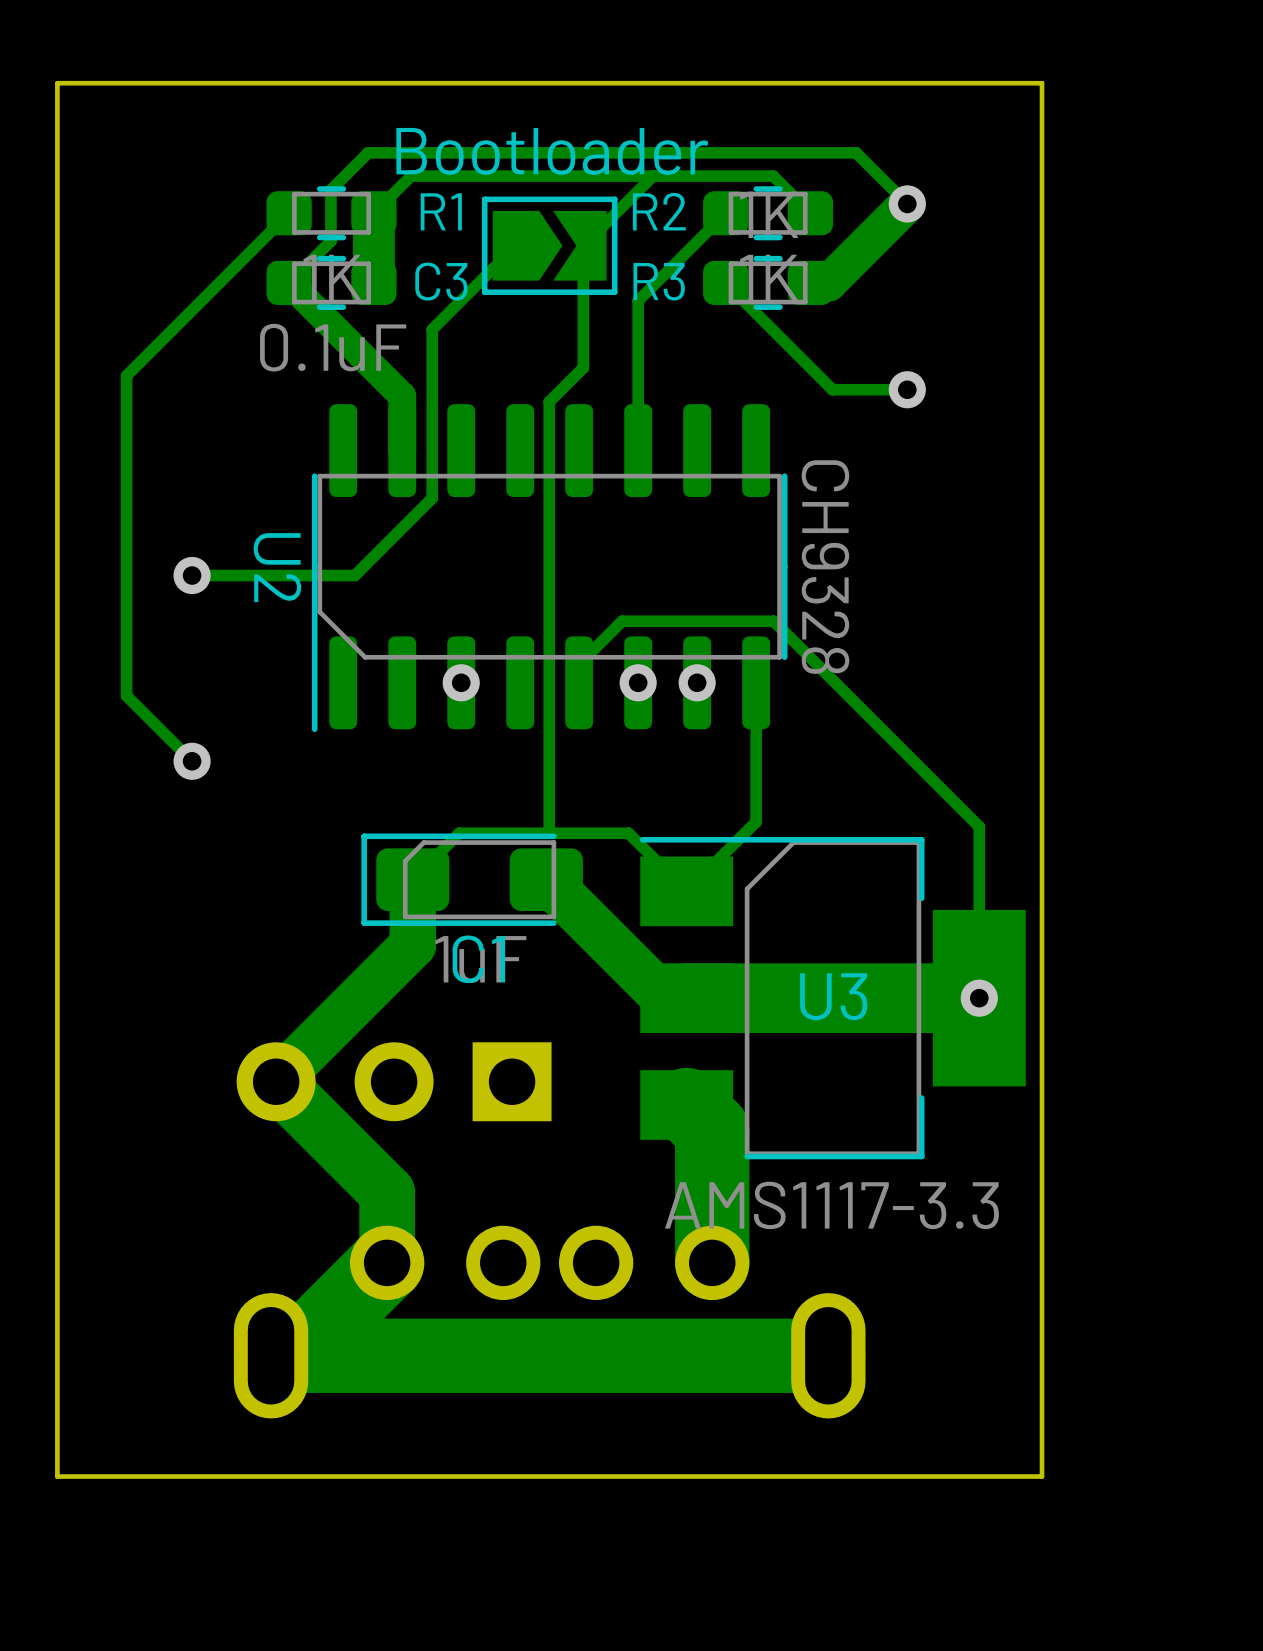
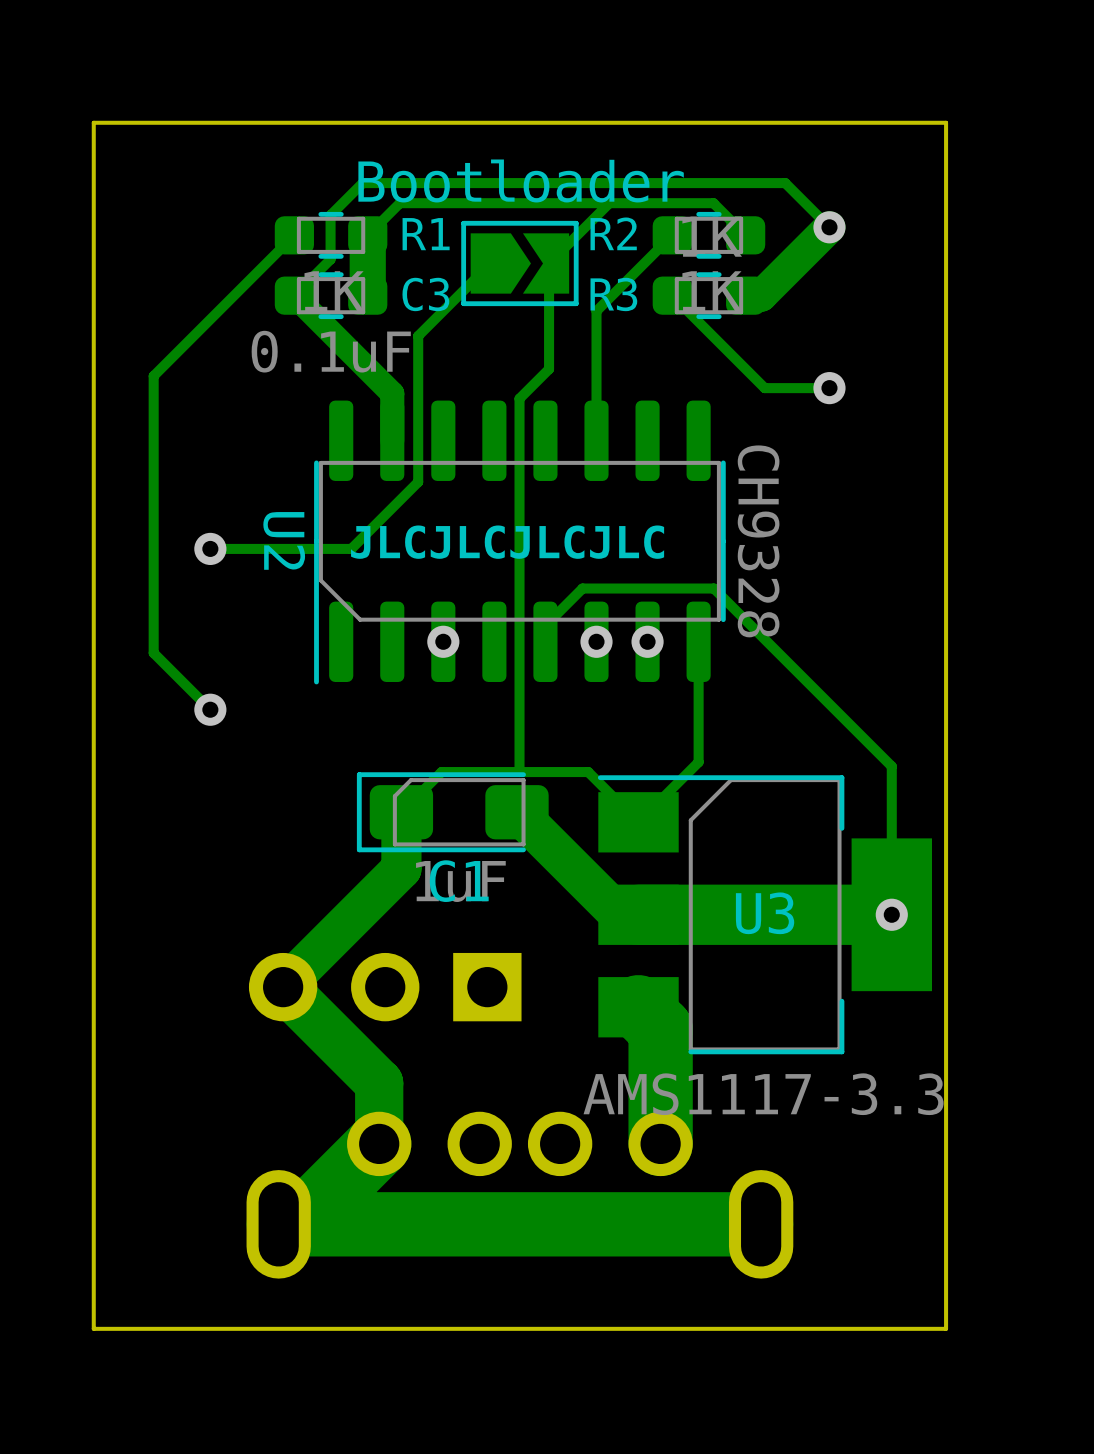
text: none -> JLCJLCJLCJLC (507, 542)

